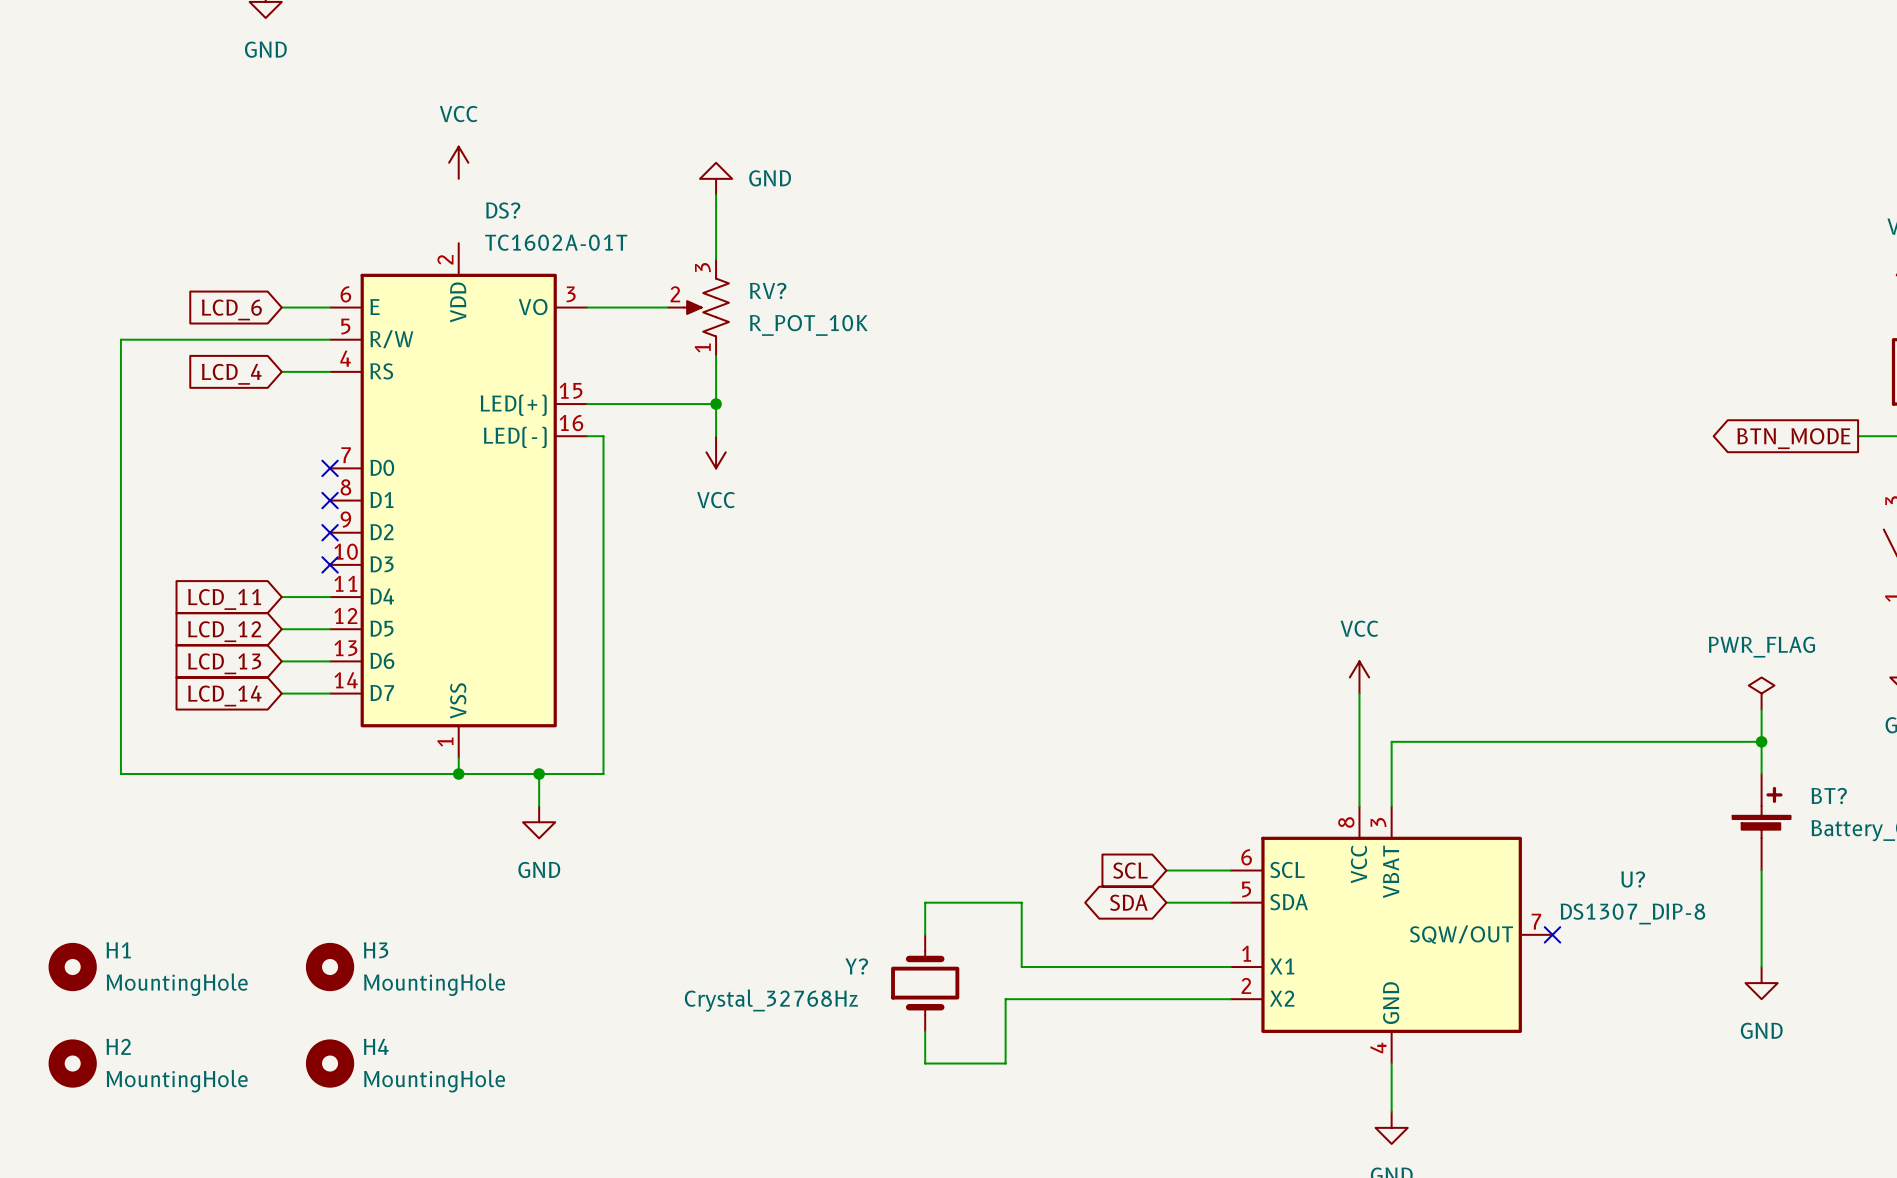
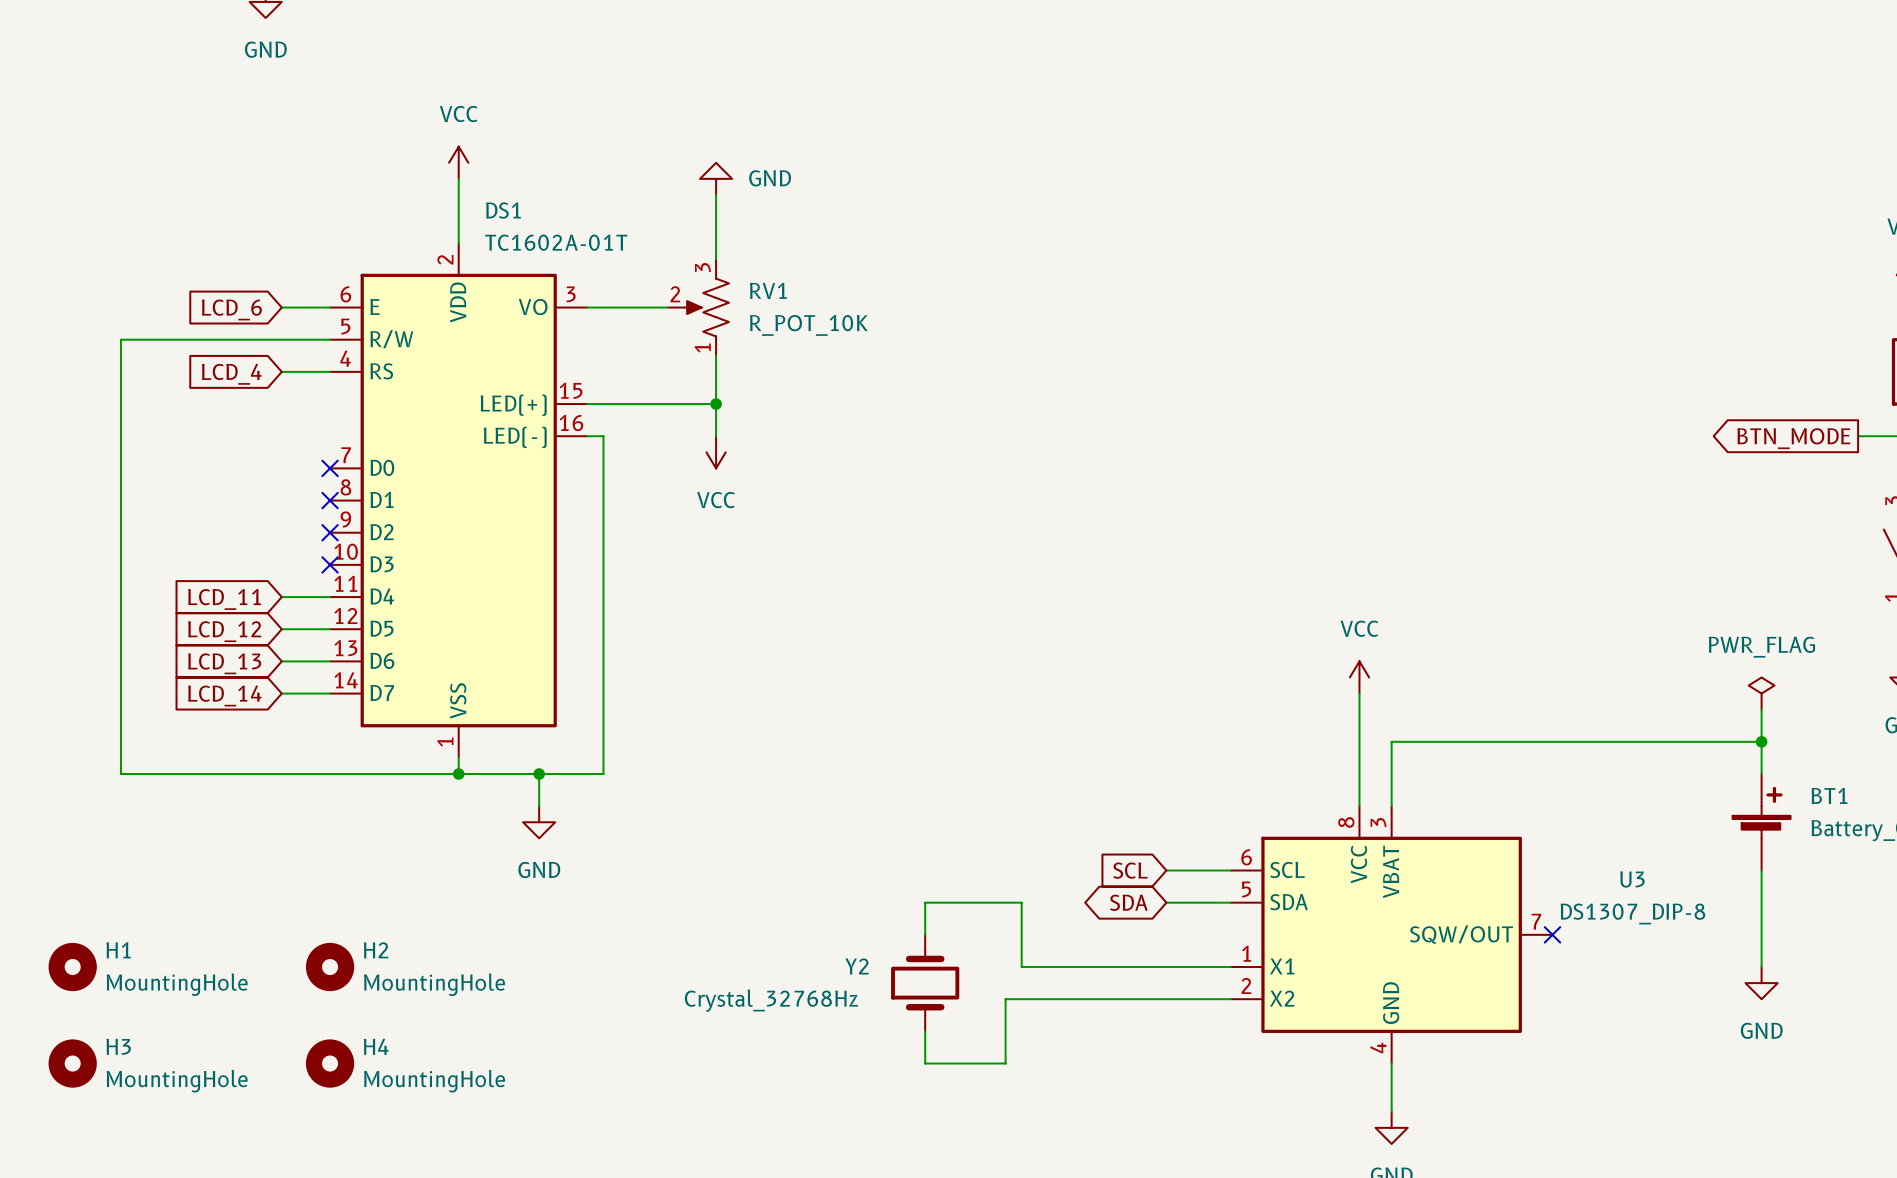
wire: none -> (458, 178) (458, 243)
DS? name: DS? (503, 210) -> DS1 (503, 210)
RV? name: RV? (768, 290) -> RV1 (768, 290)
BT? name: BT? (1829, 796) -> BT1 (1829, 795)
U? name: U? (1633, 879) -> U3 (1632, 879)
H3 name: H3 (376, 950) -> H2 (376, 950)
Y? name: Y? (856, 966) -> Y2 (857, 966)
H2 name: H2 (118, 1046) -> H3 (118, 1046)

